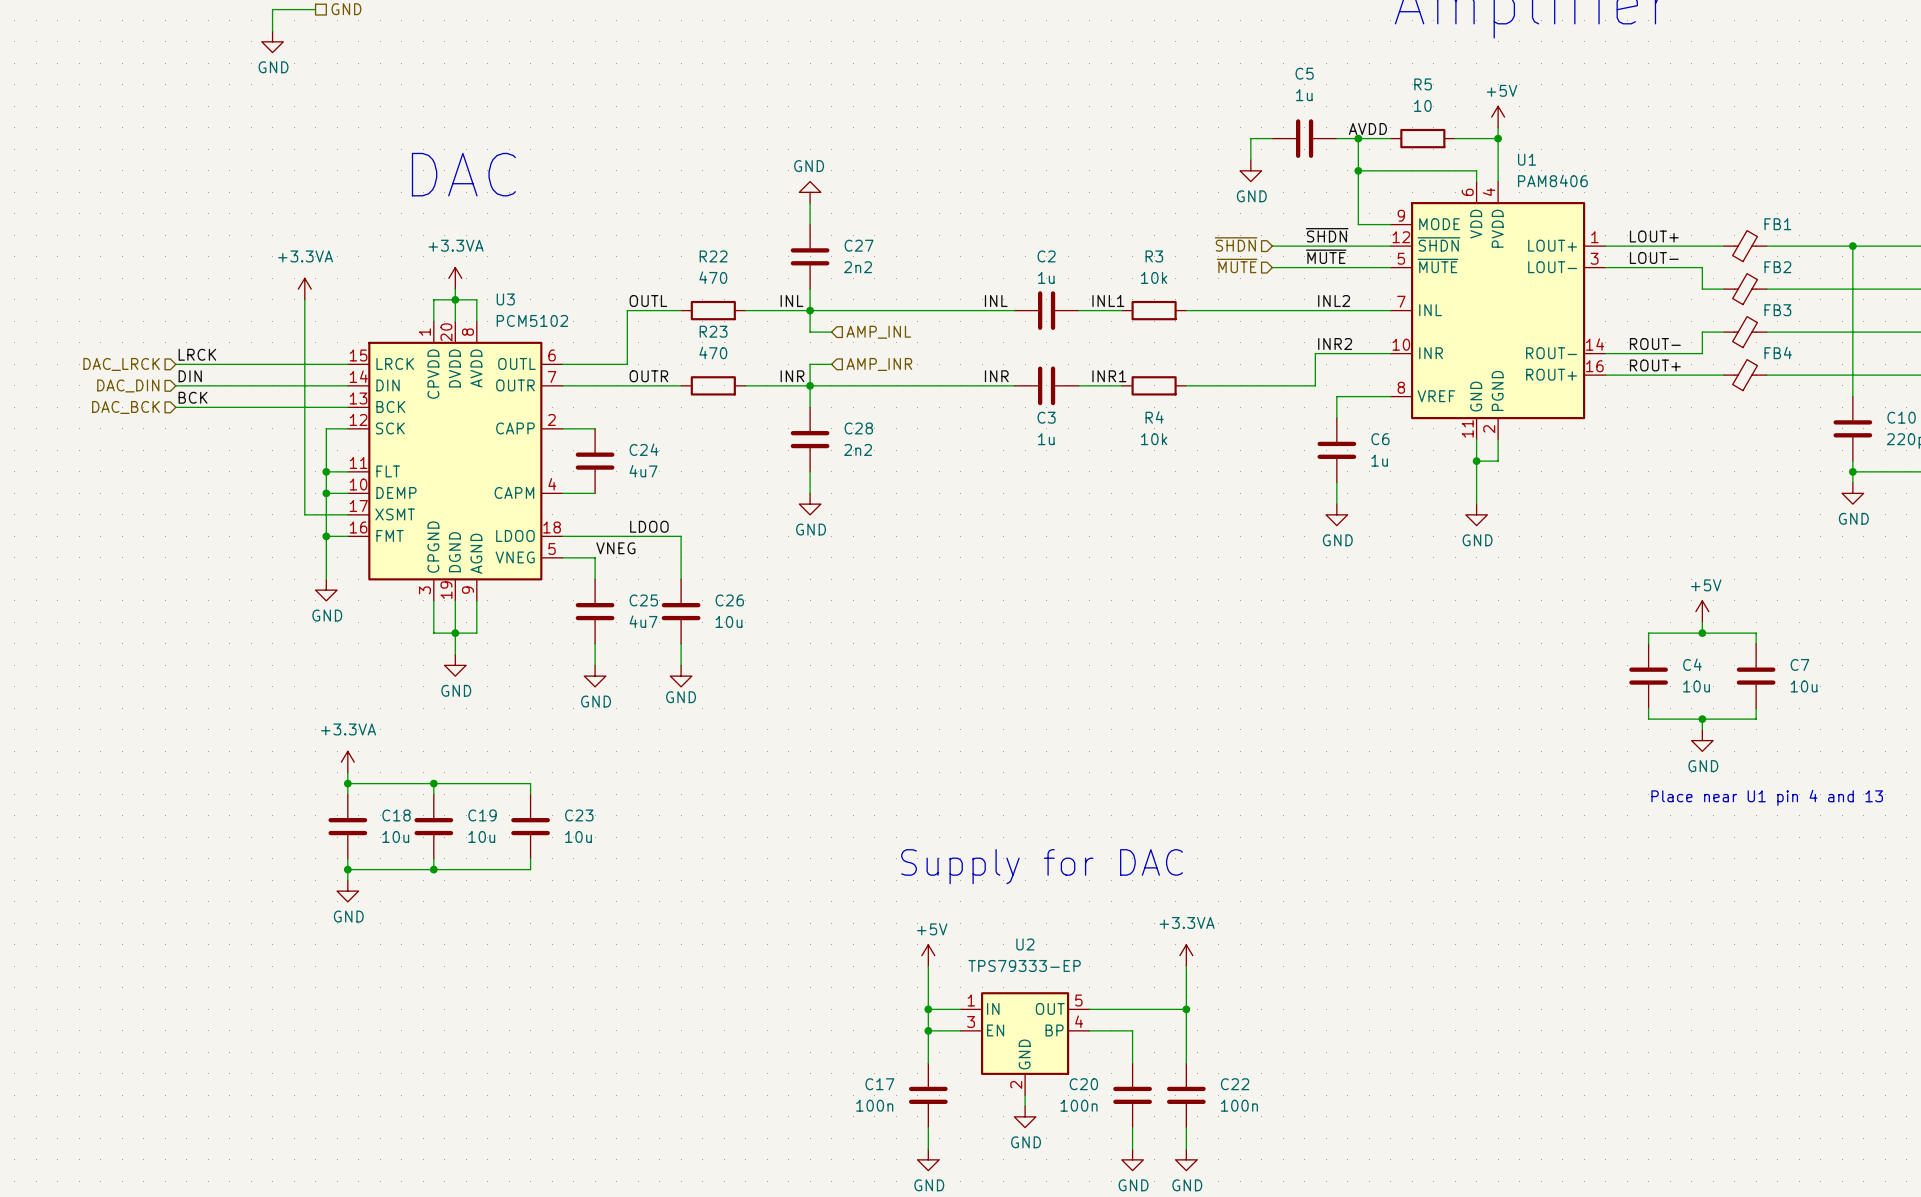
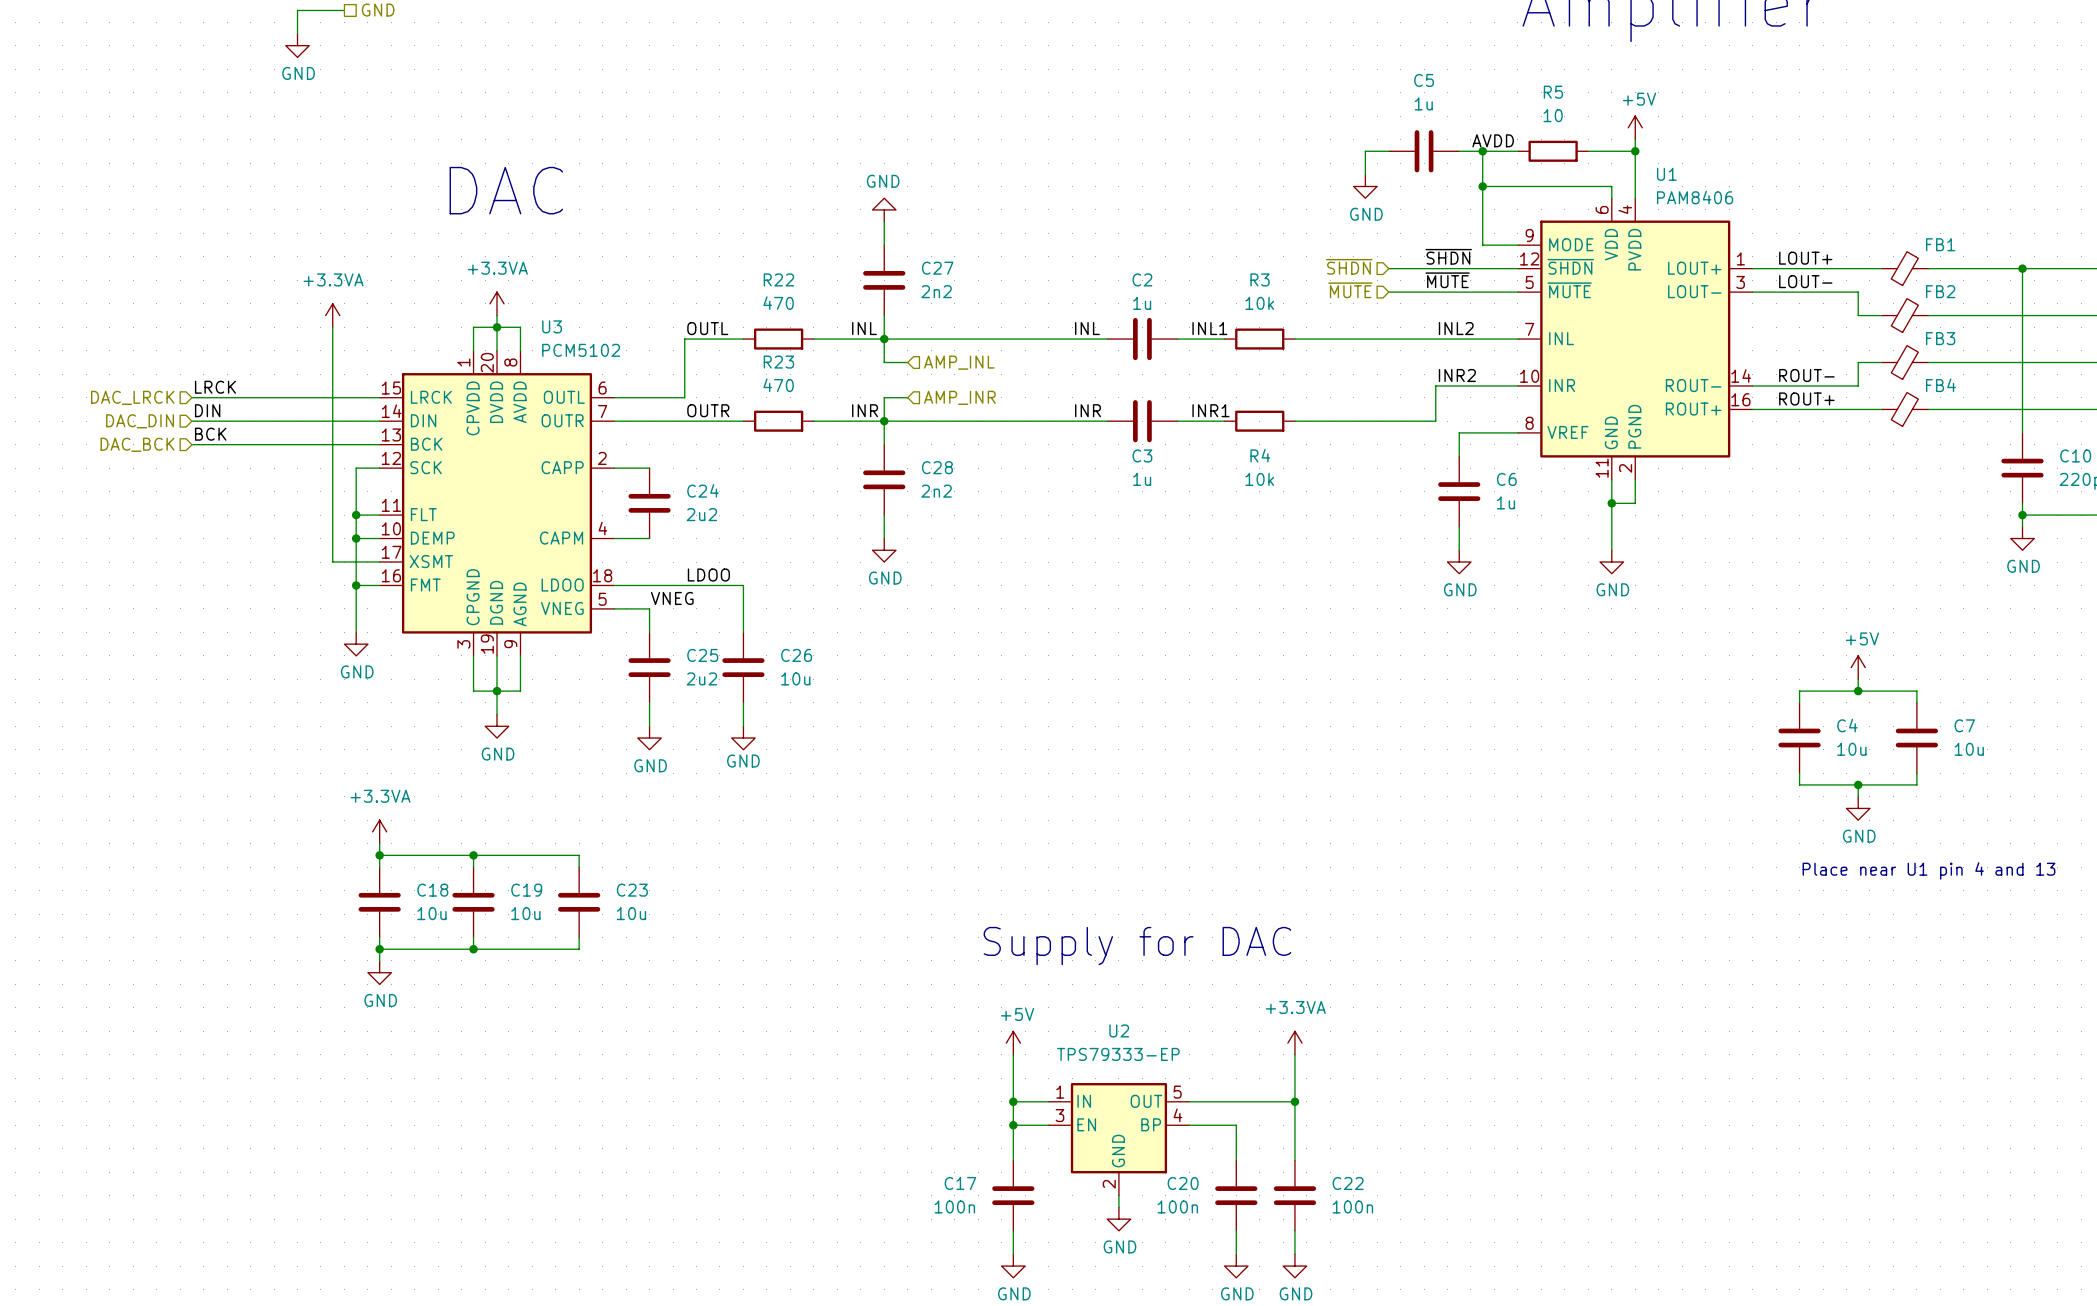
C24 value: 4u7 (643, 471) -> 2u2 (701, 514)
C25 value: 4u7 (643, 621) -> 2u2 (701, 678)

